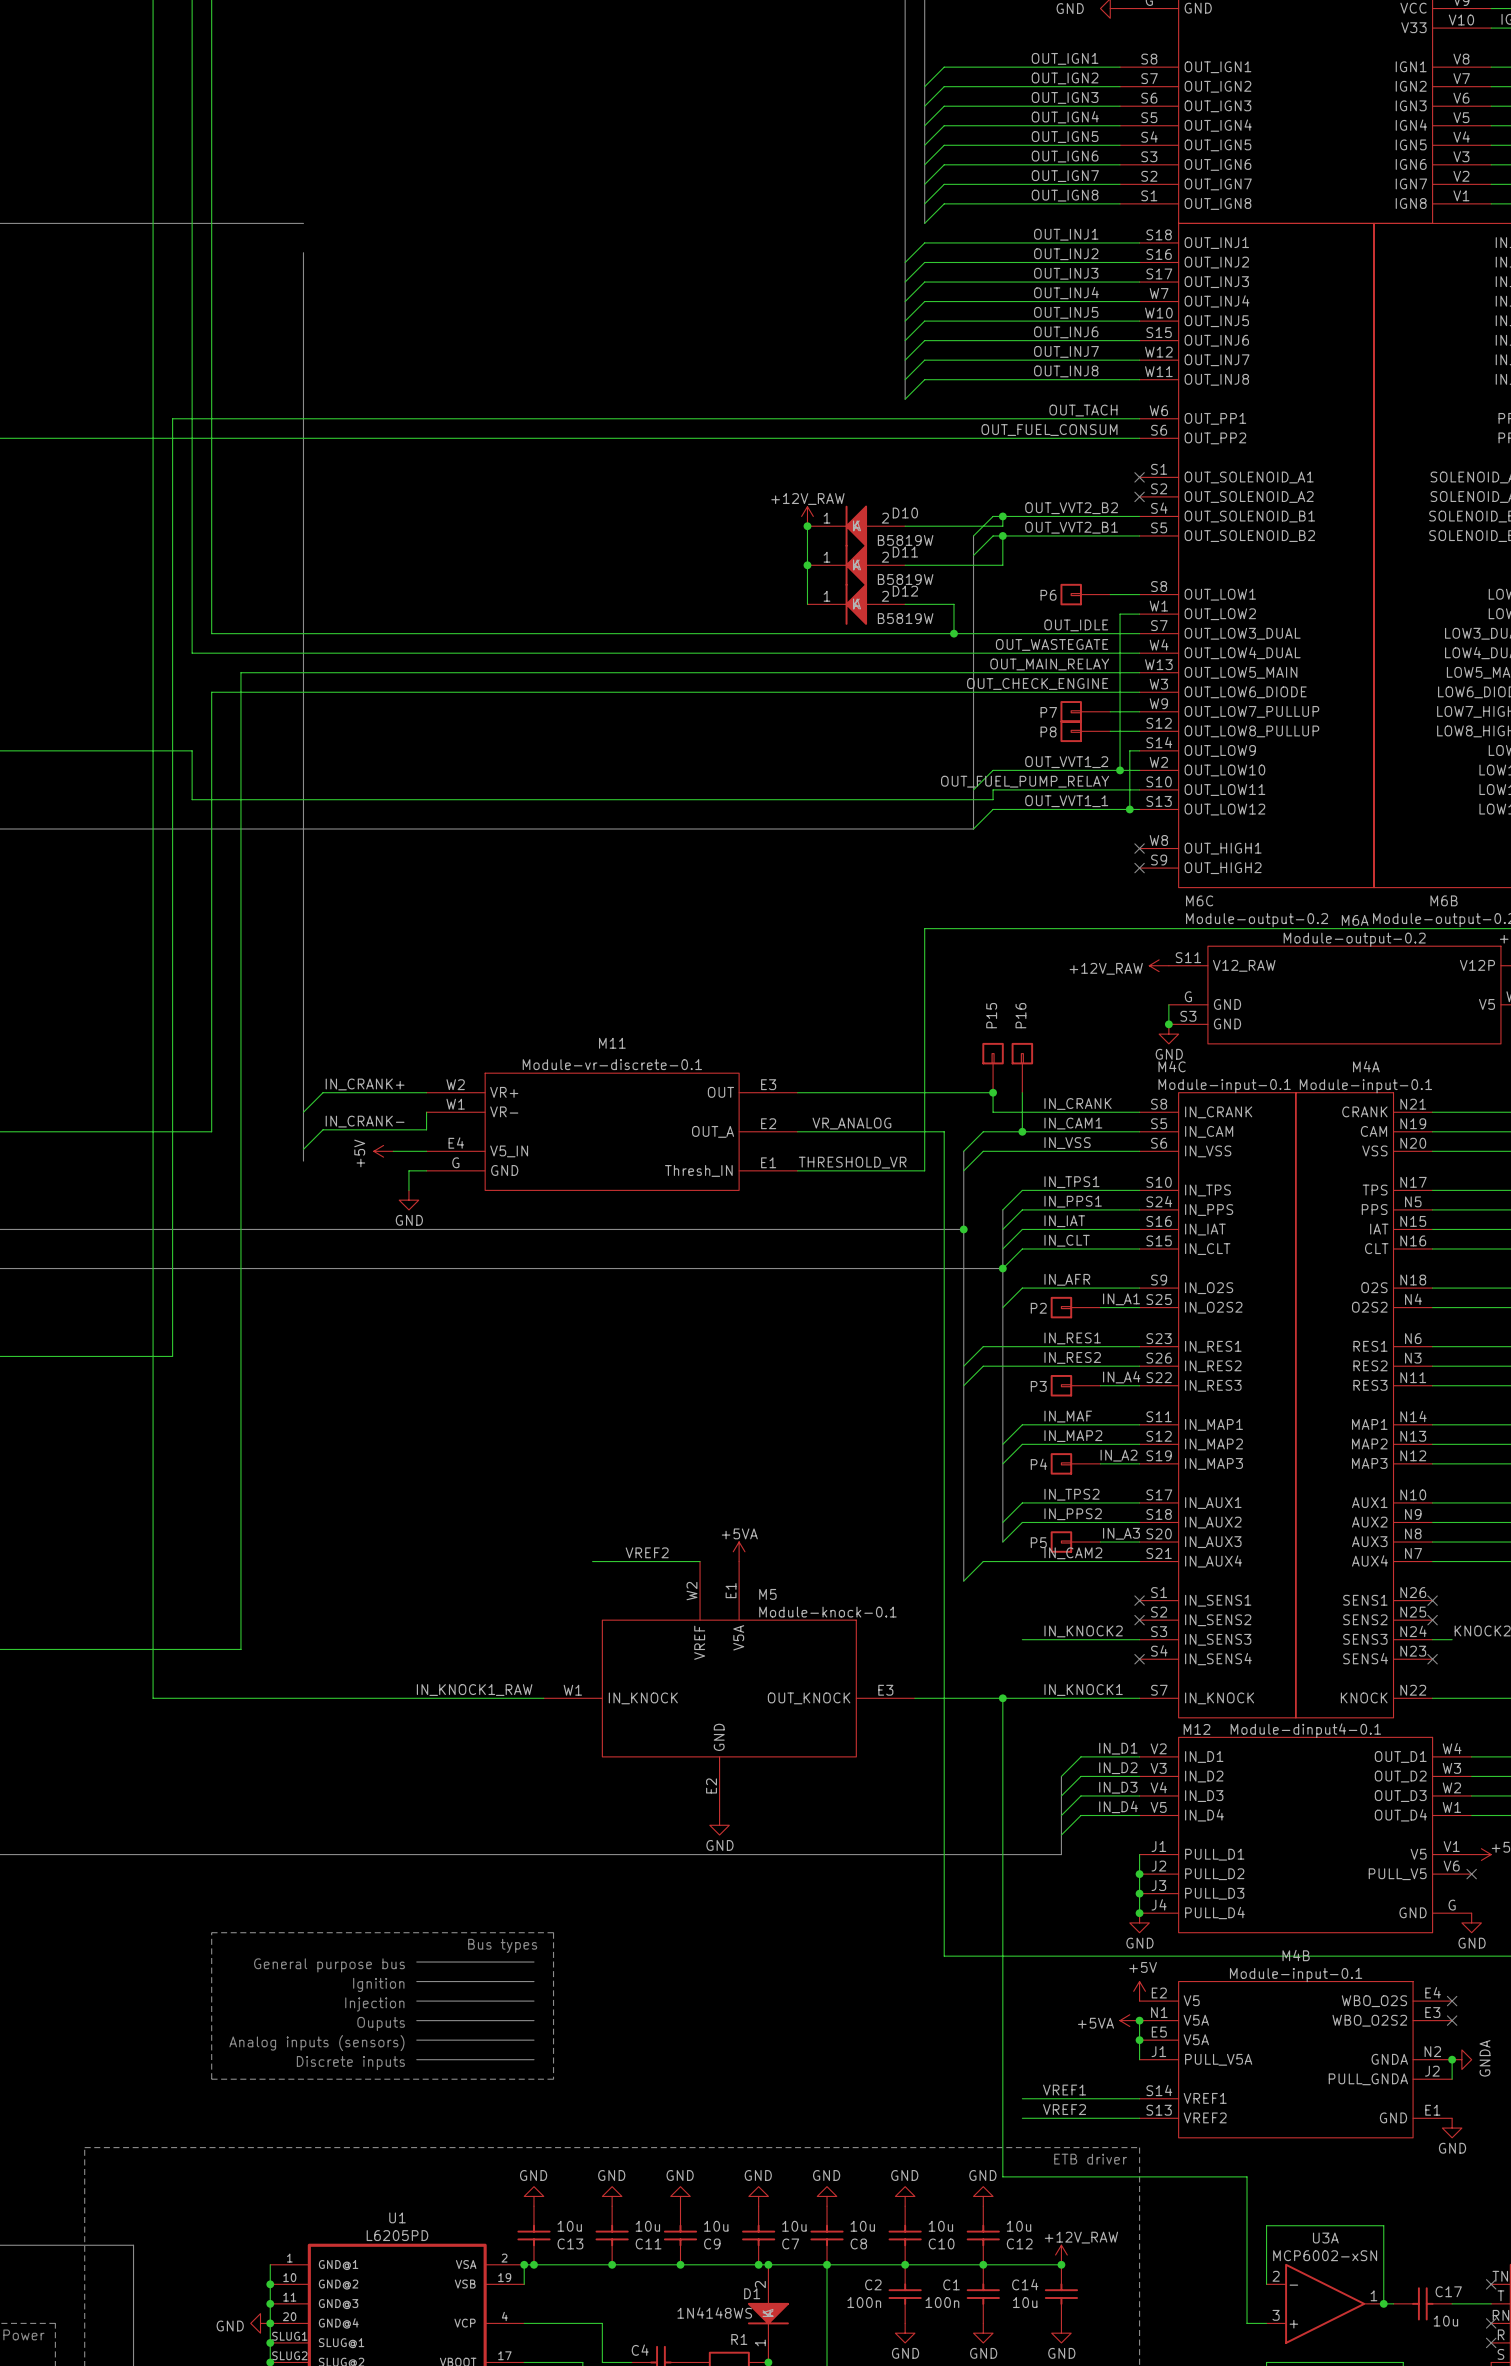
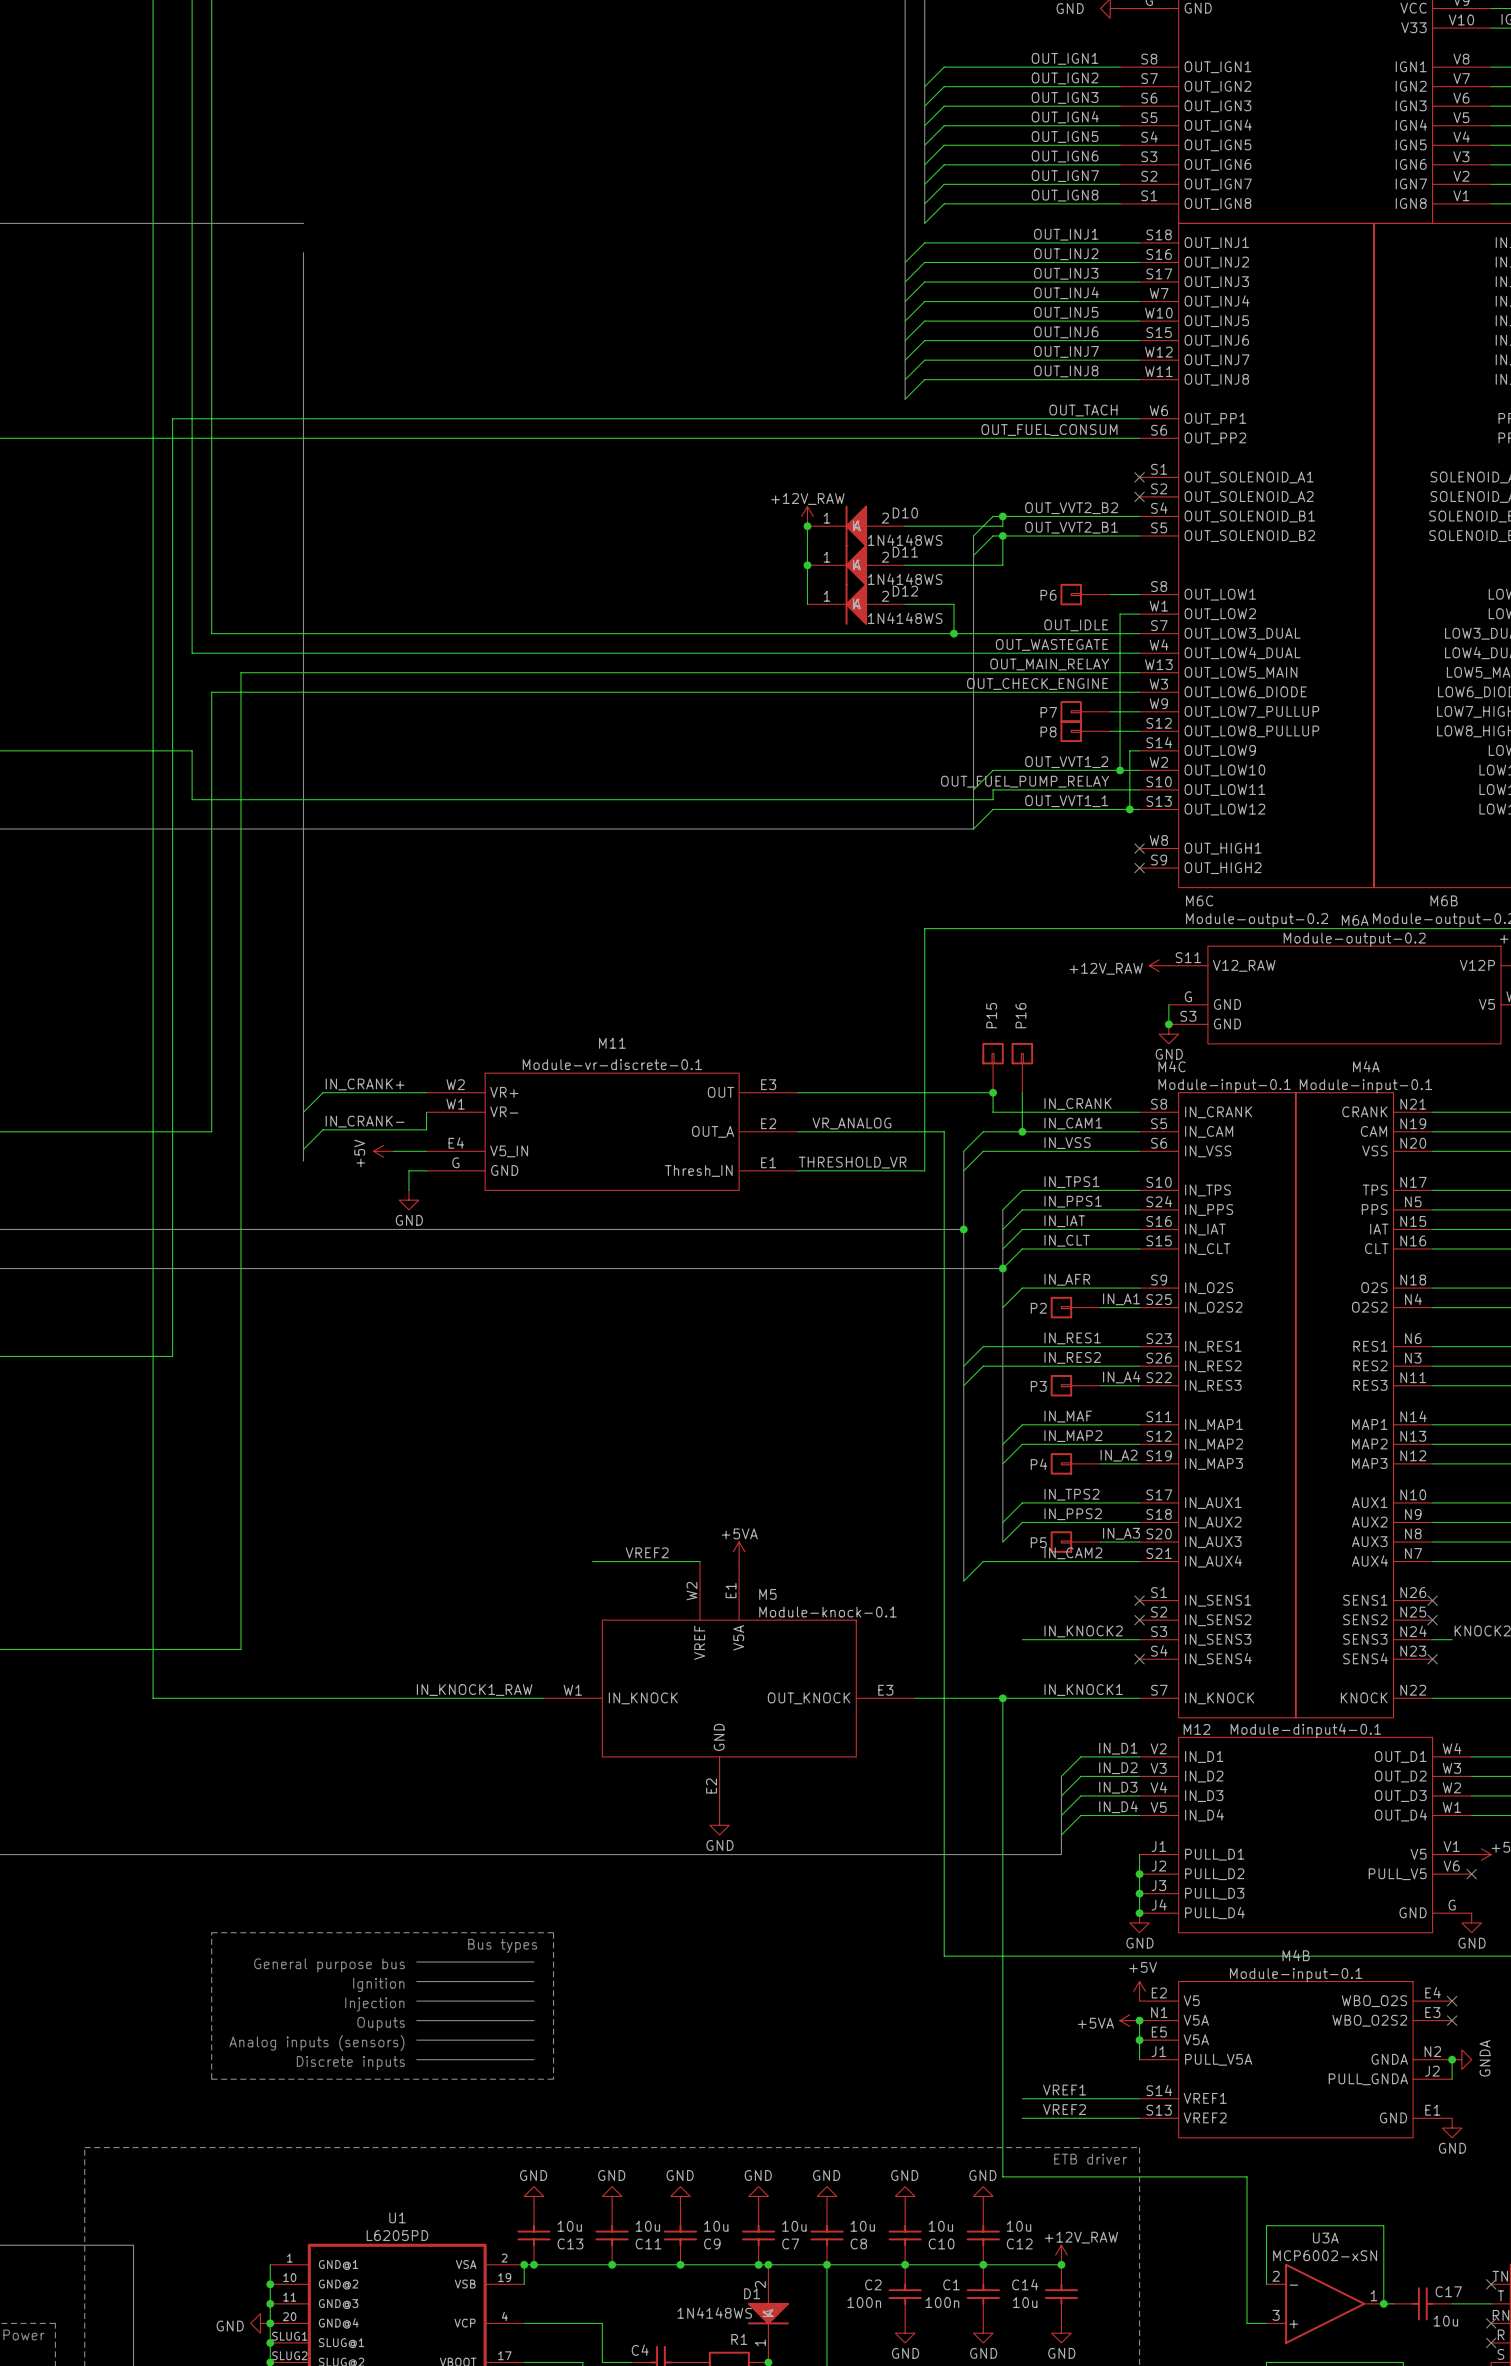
D10 value: B5819W (905, 540) -> 1N4148WS (905, 540)
D11 value: B5819W (905, 579) -> 1N4148WS (905, 579)
D12 value: B5819W (905, 618) -> 1N4148WS (905, 618)

